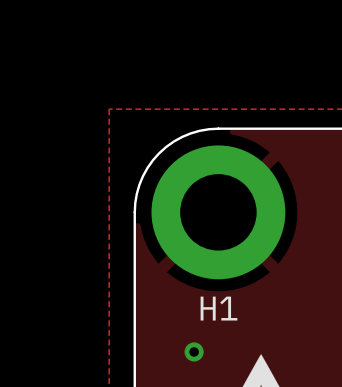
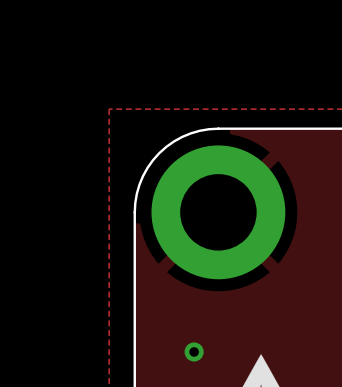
H1 name: H1 (218, 308) -> none

